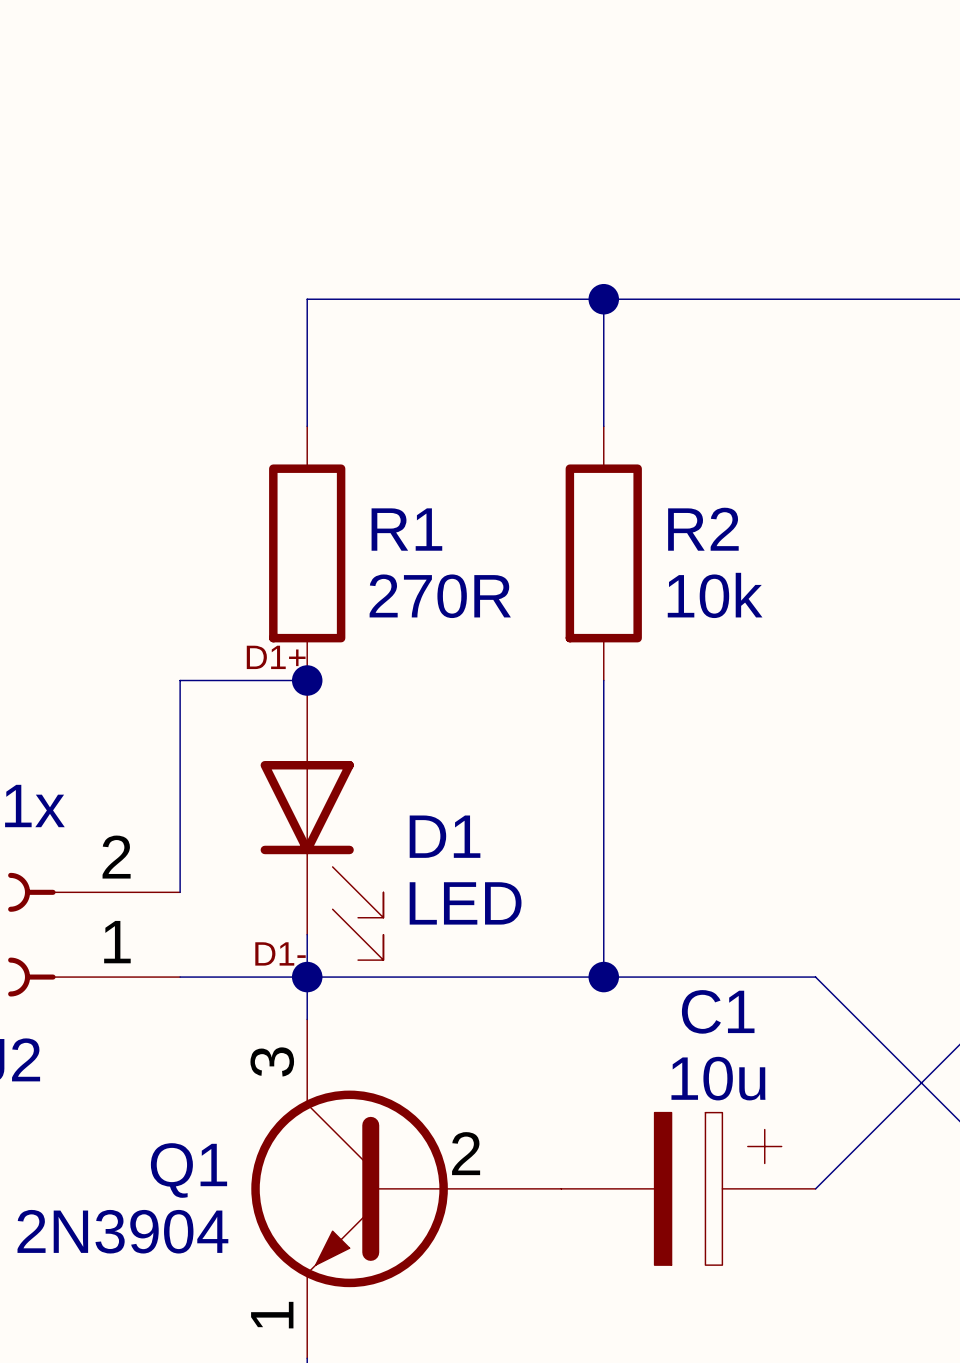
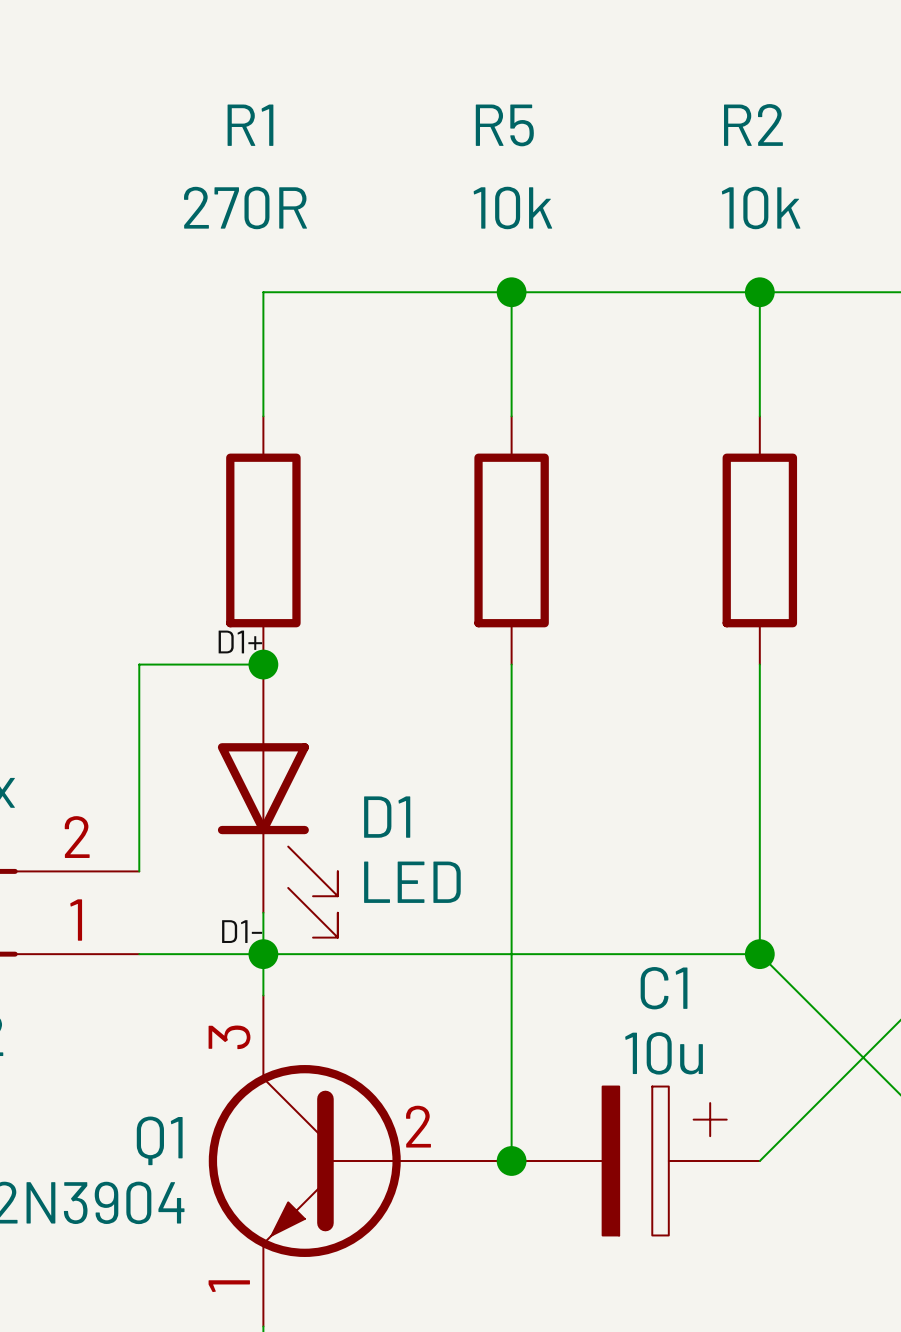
wire: none -> (511, 292) (511, 416)
wire: (603, 299) (603, 426) -> (759, 292) (759, 416)
junction position: (603, 299) -> (511, 292)
junction: none -> (759, 292)
R1 name position: R1 (406, 529) -> R1 (250, 125)
R2 name position: R2 (703, 529) -> R2 (753, 124)
R5: none -> 10k (511, 540)
R2 position: (603, 553) -> (759, 540)
R2 value position: 10k (715, 595) -> 10k (761, 207)
R1 value position: 270R (440, 596) -> 270R (245, 207)
wire: none -> (511, 664) (511, 1161)
wire: (603, 680) (603, 977) -> (759, 664) (759, 954)
junction: (603, 977) -> none
junction: none -> (759, 954)
junction: none -> (511, 1161)

